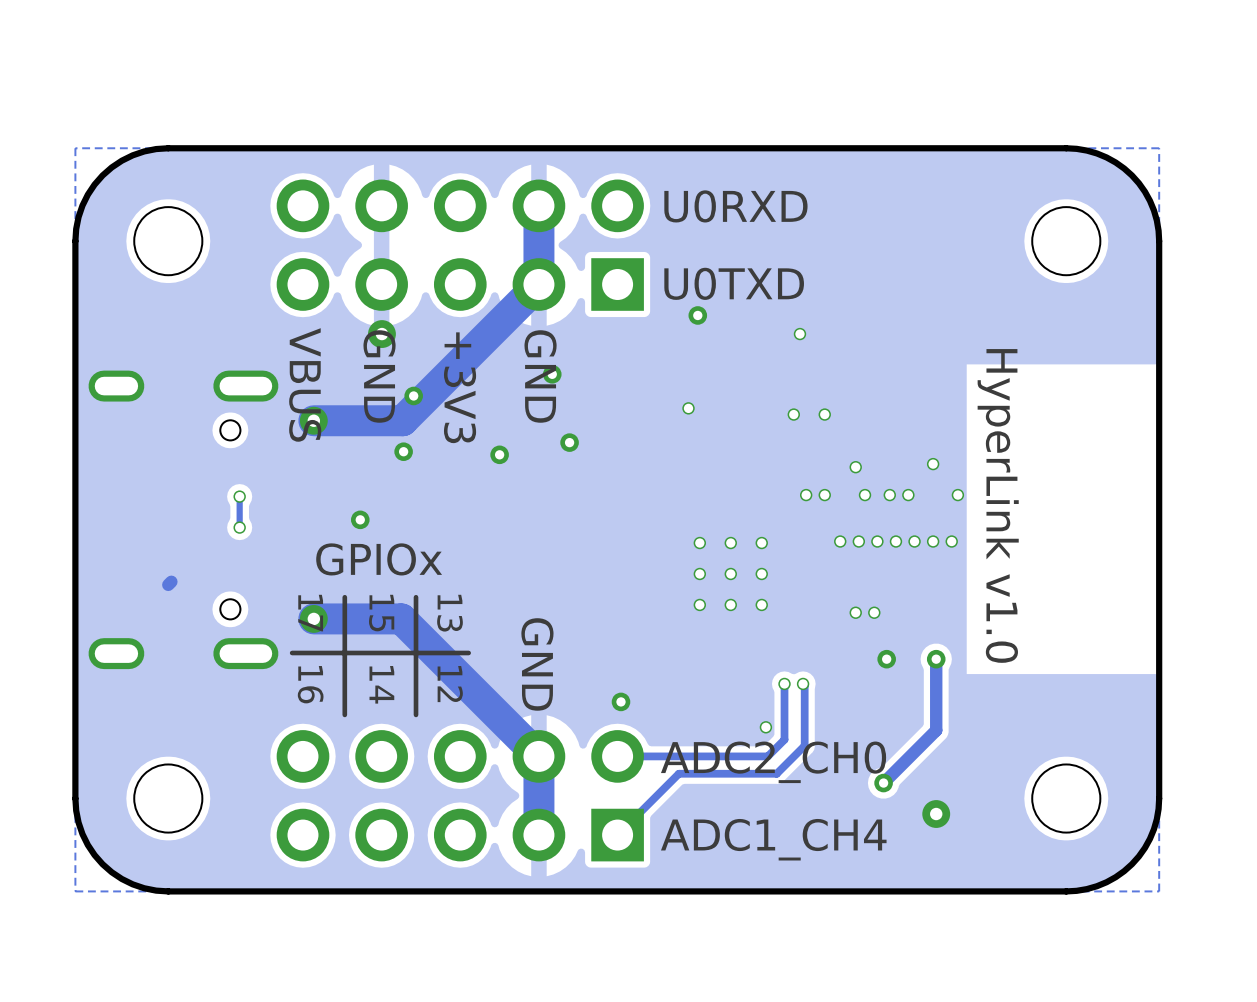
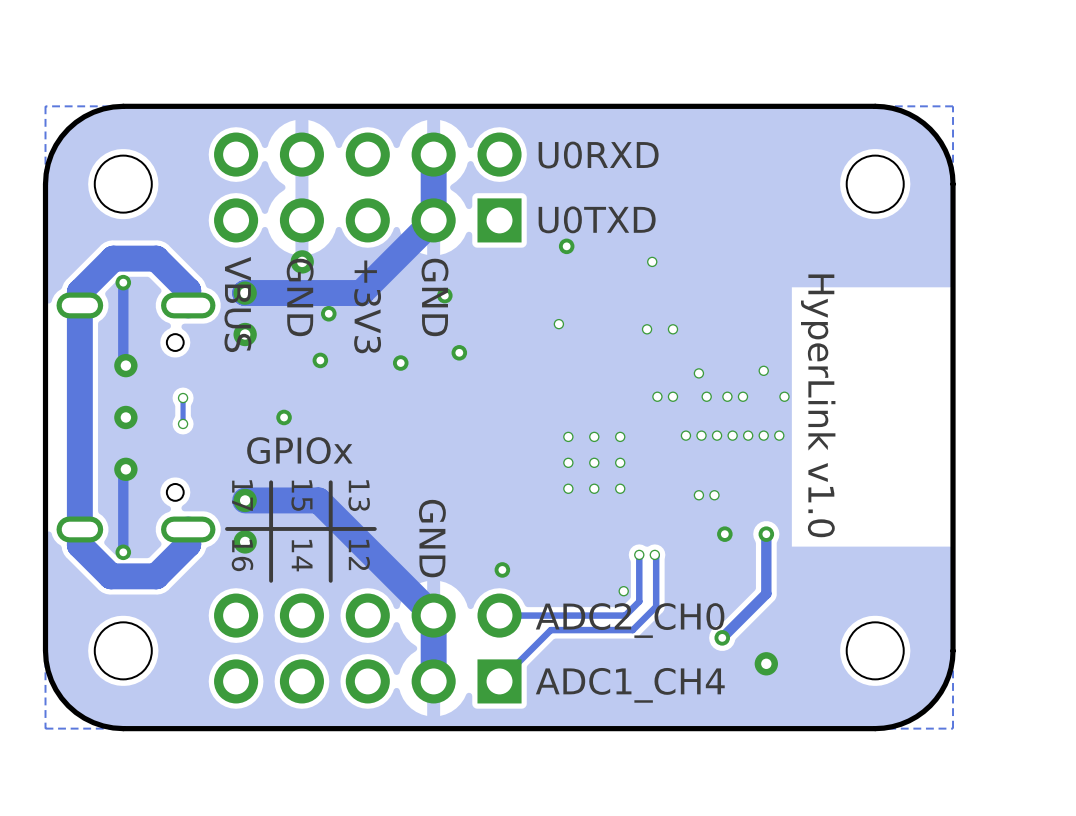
track: none -> (123, 282) (123, 363) (125, 365)
via: none -> (123, 282)
via: none -> (245, 293)
track: (452, 371) (402, 420) (313, 420) -> (361, 293) (245, 293)
track: none -> (188, 305) (188, 290) (156, 258) (113, 258) (79, 292) (79, 545) (111, 576) (156, 576) (188, 544) (188, 529)
via: none -> (125, 365)
via: none -> (125, 417)
via: none -> (125, 469)
track: none -> (123, 471) (123, 552)
via: none -> (245, 541)
via: none -> (123, 552)

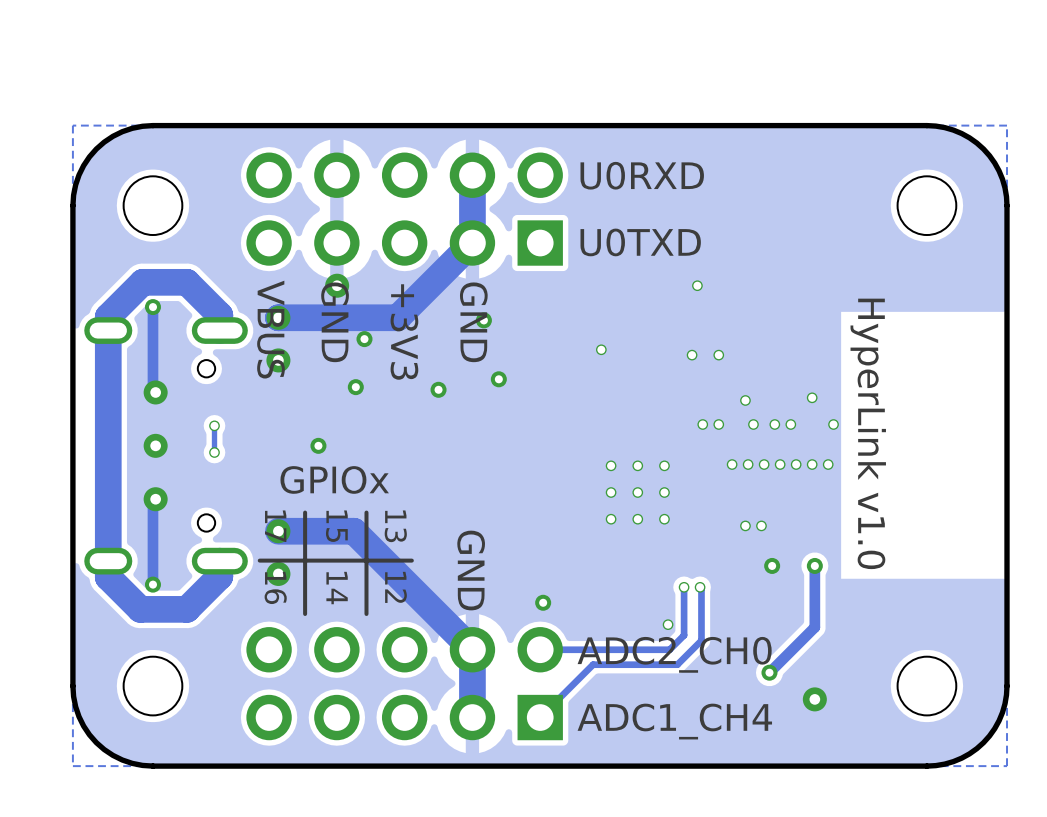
via: (566, 246) -> none

